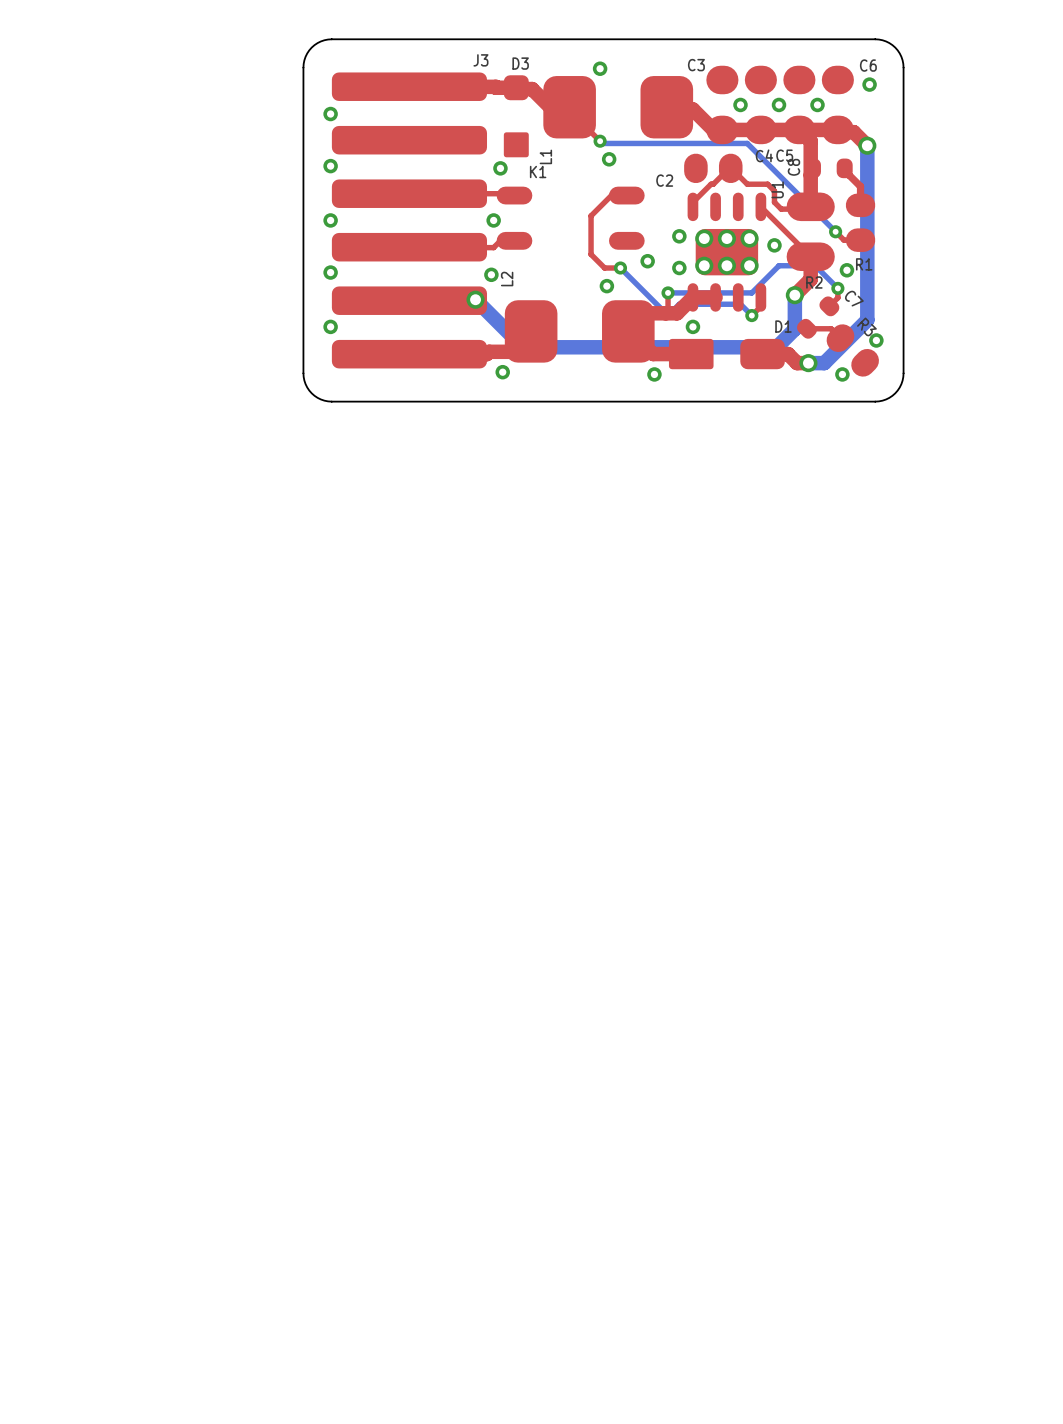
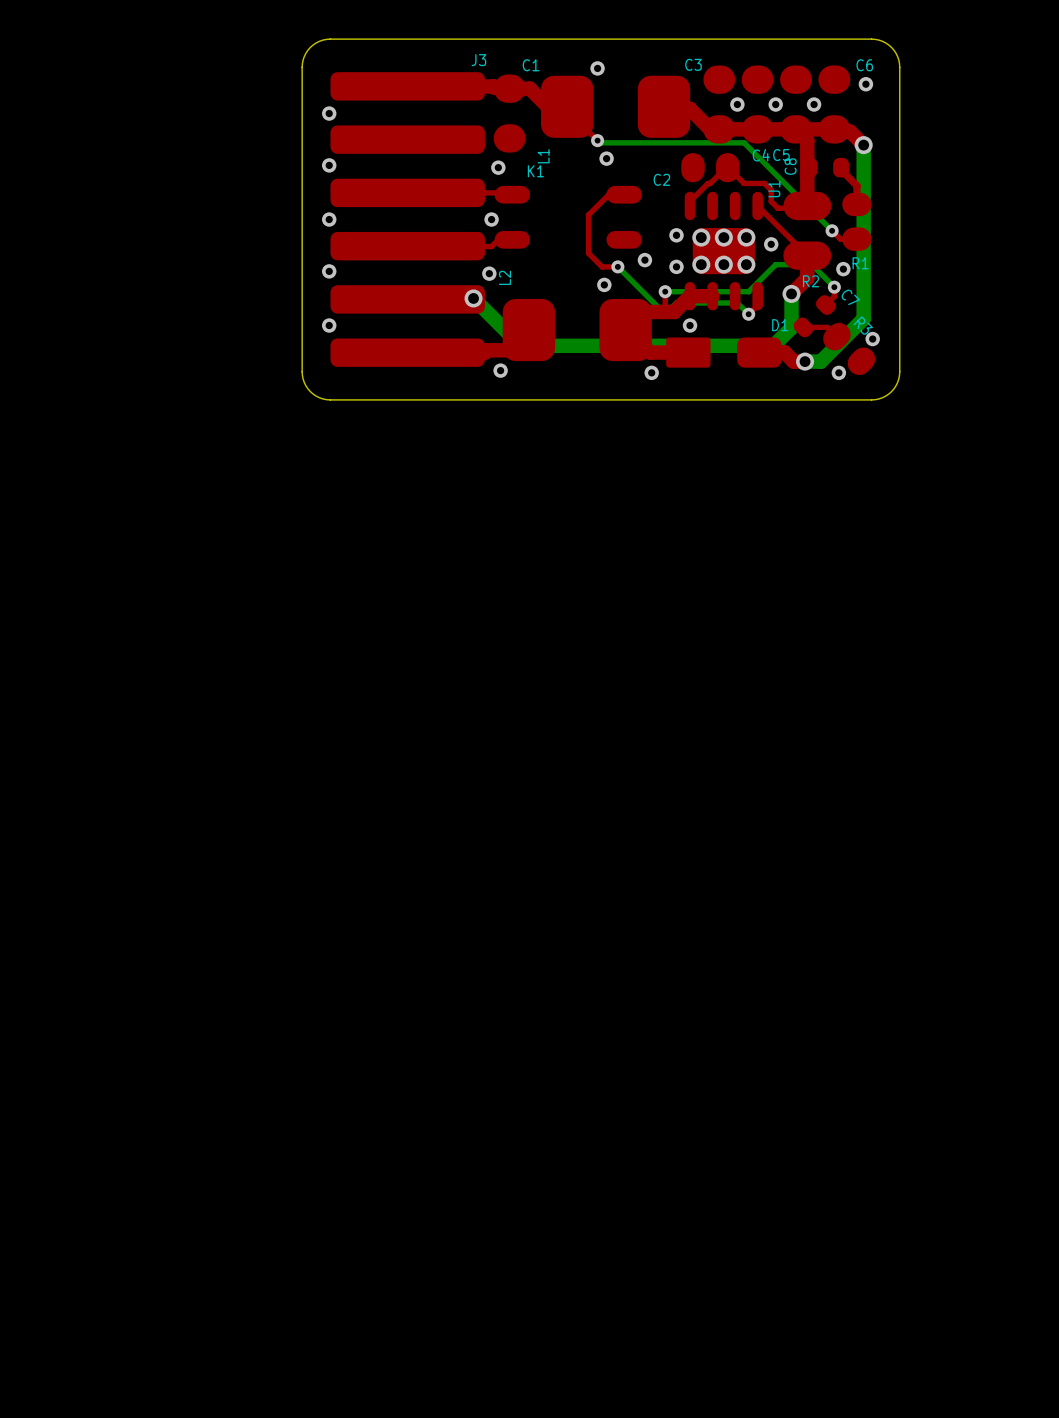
C1: none -> (509, 113)
D3: (516, 116) -> none

